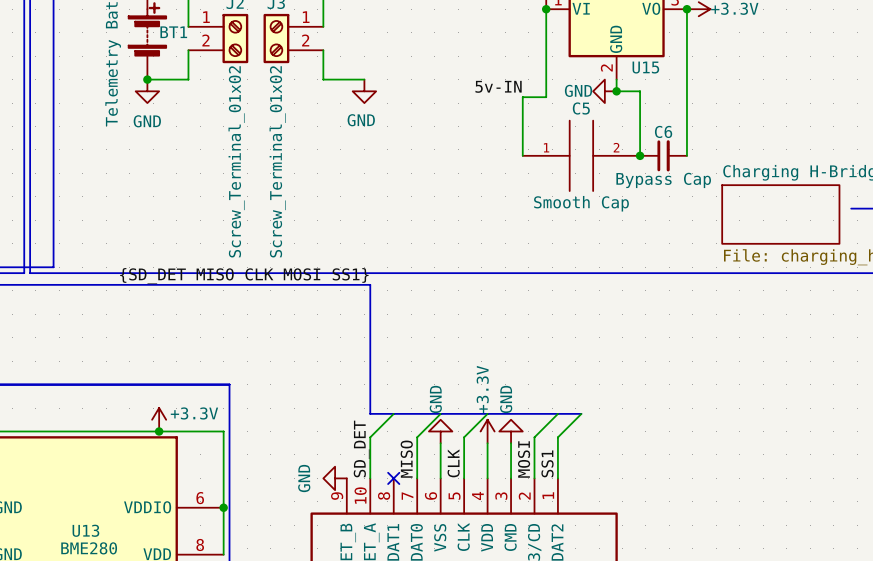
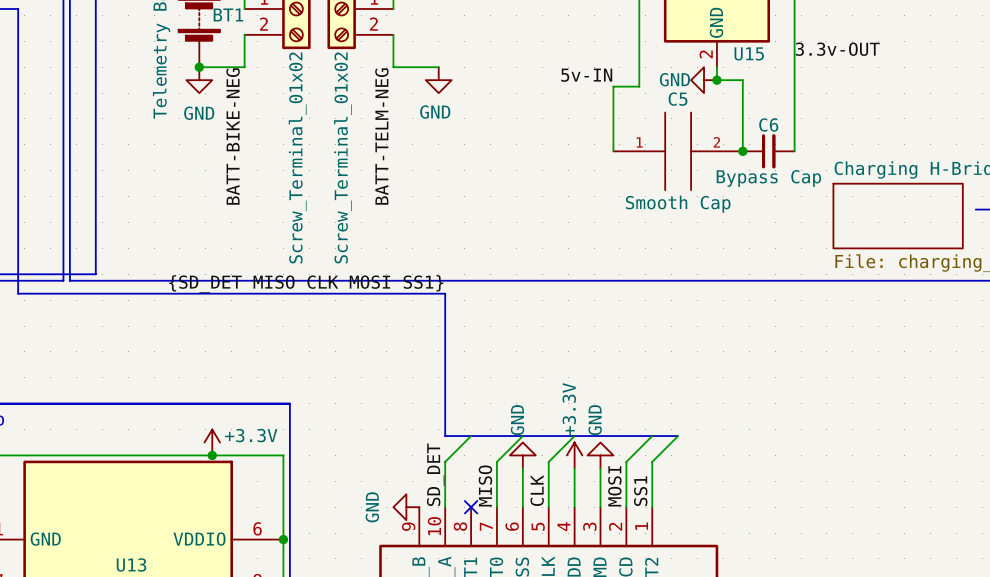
label: none -> 3.3v-OUT (837, 49)
label: none -> BATT-BIKE-NEG (233, 136)
label: none -> BATT-TELM-NEG (381, 136)

